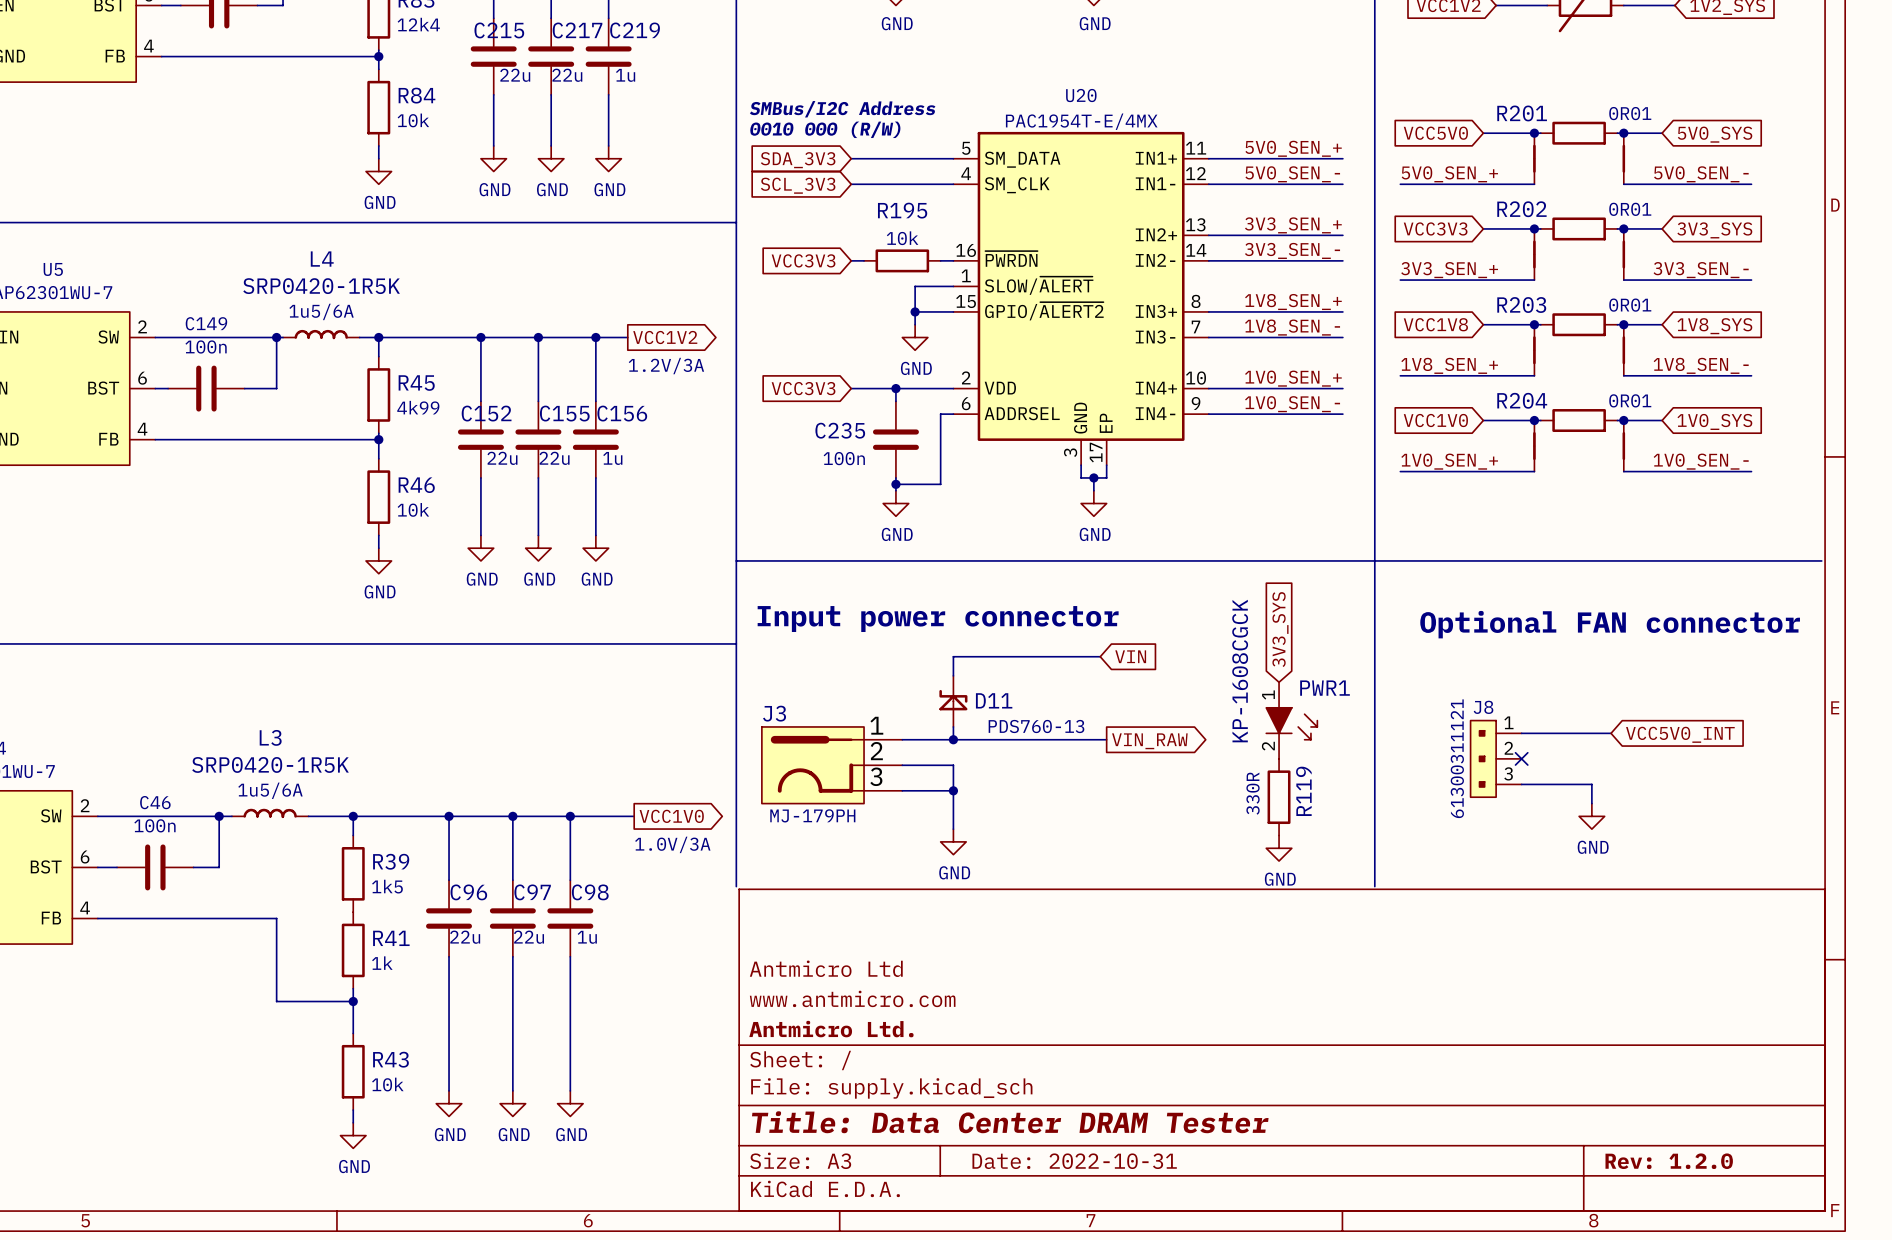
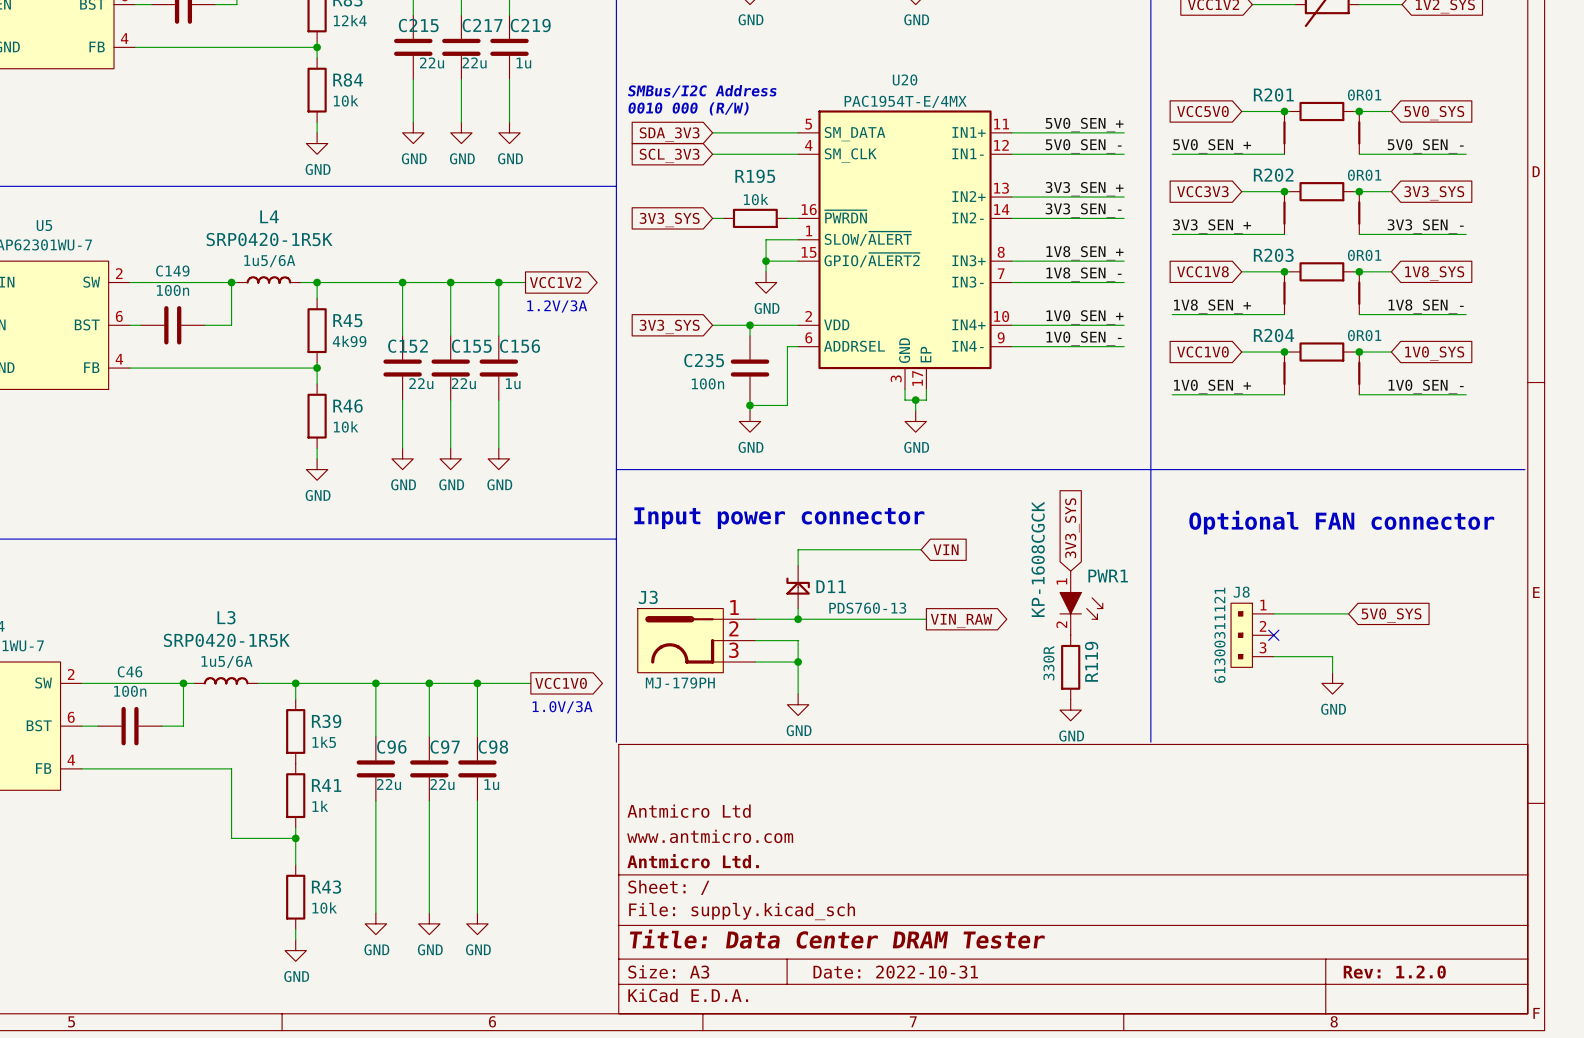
global label: VCC3V3 (803, 260) -> 3V3_SYS (669, 220)
global label: VCC3V3 (803, 388) -> 3V3_SYS (669, 326)
global label: VCC5V0_INT (1680, 734) -> 5V0_SYS (1391, 615)

